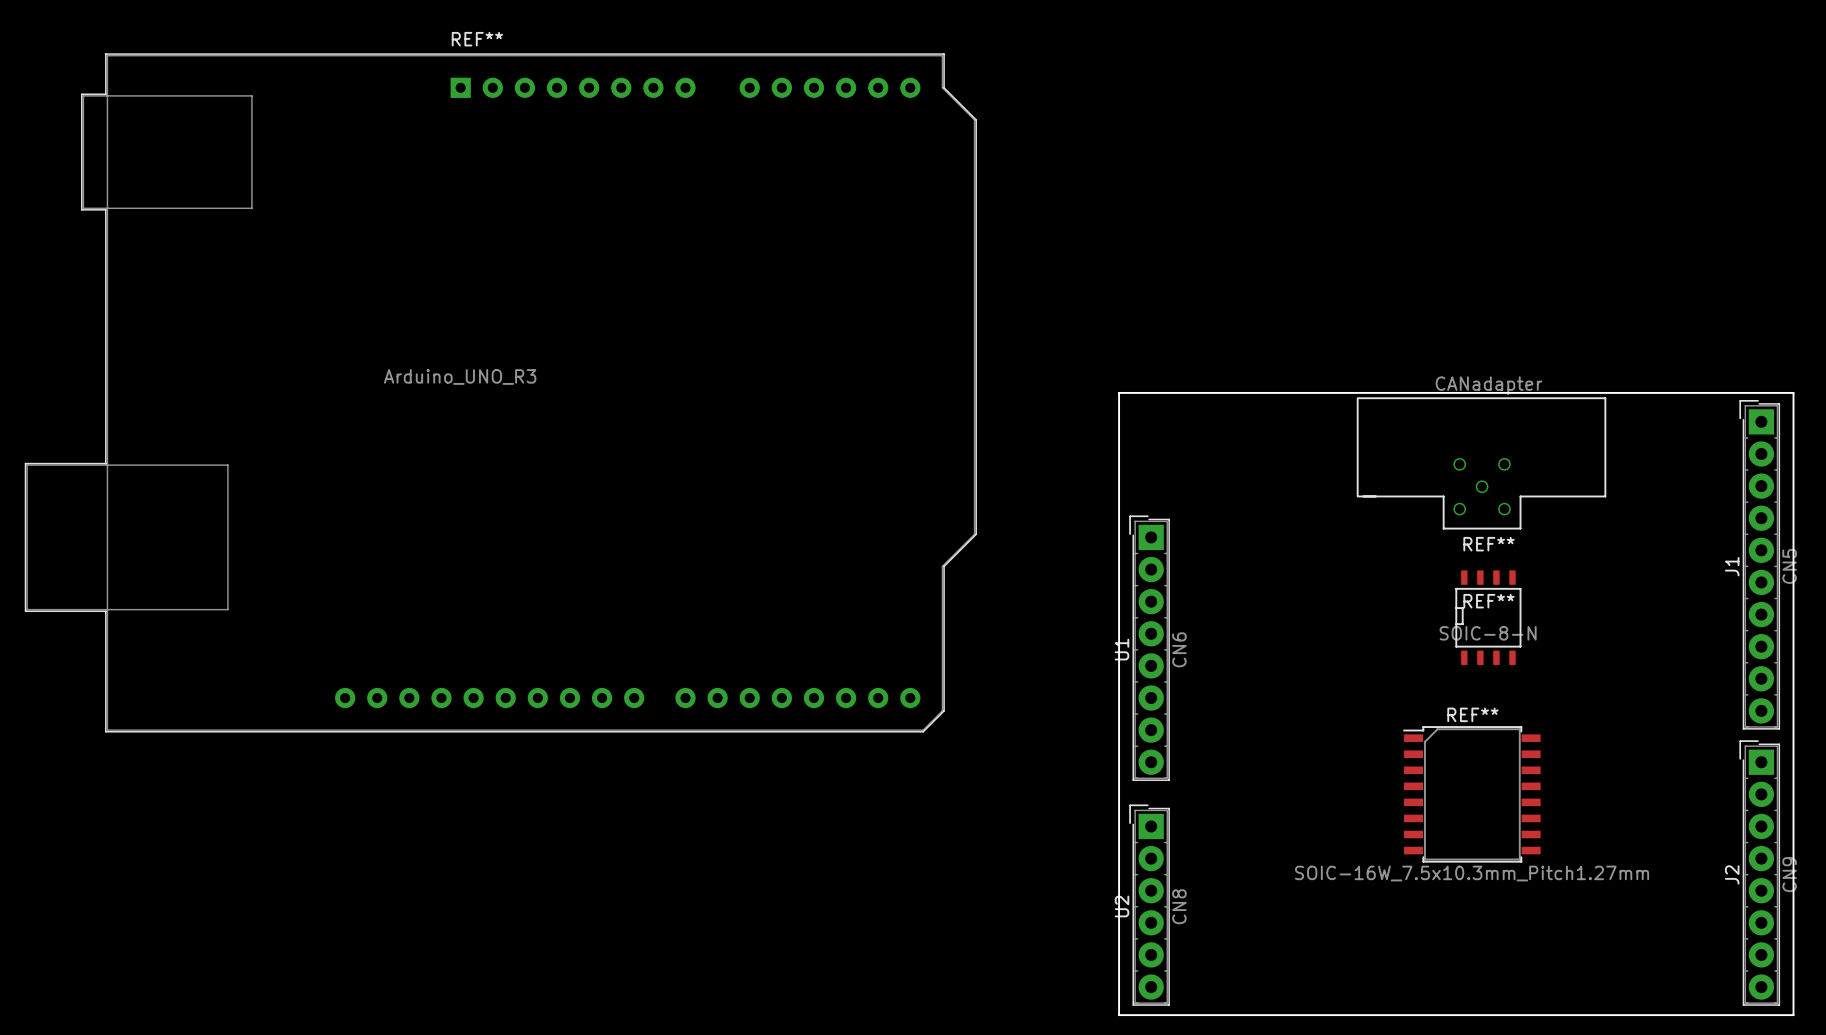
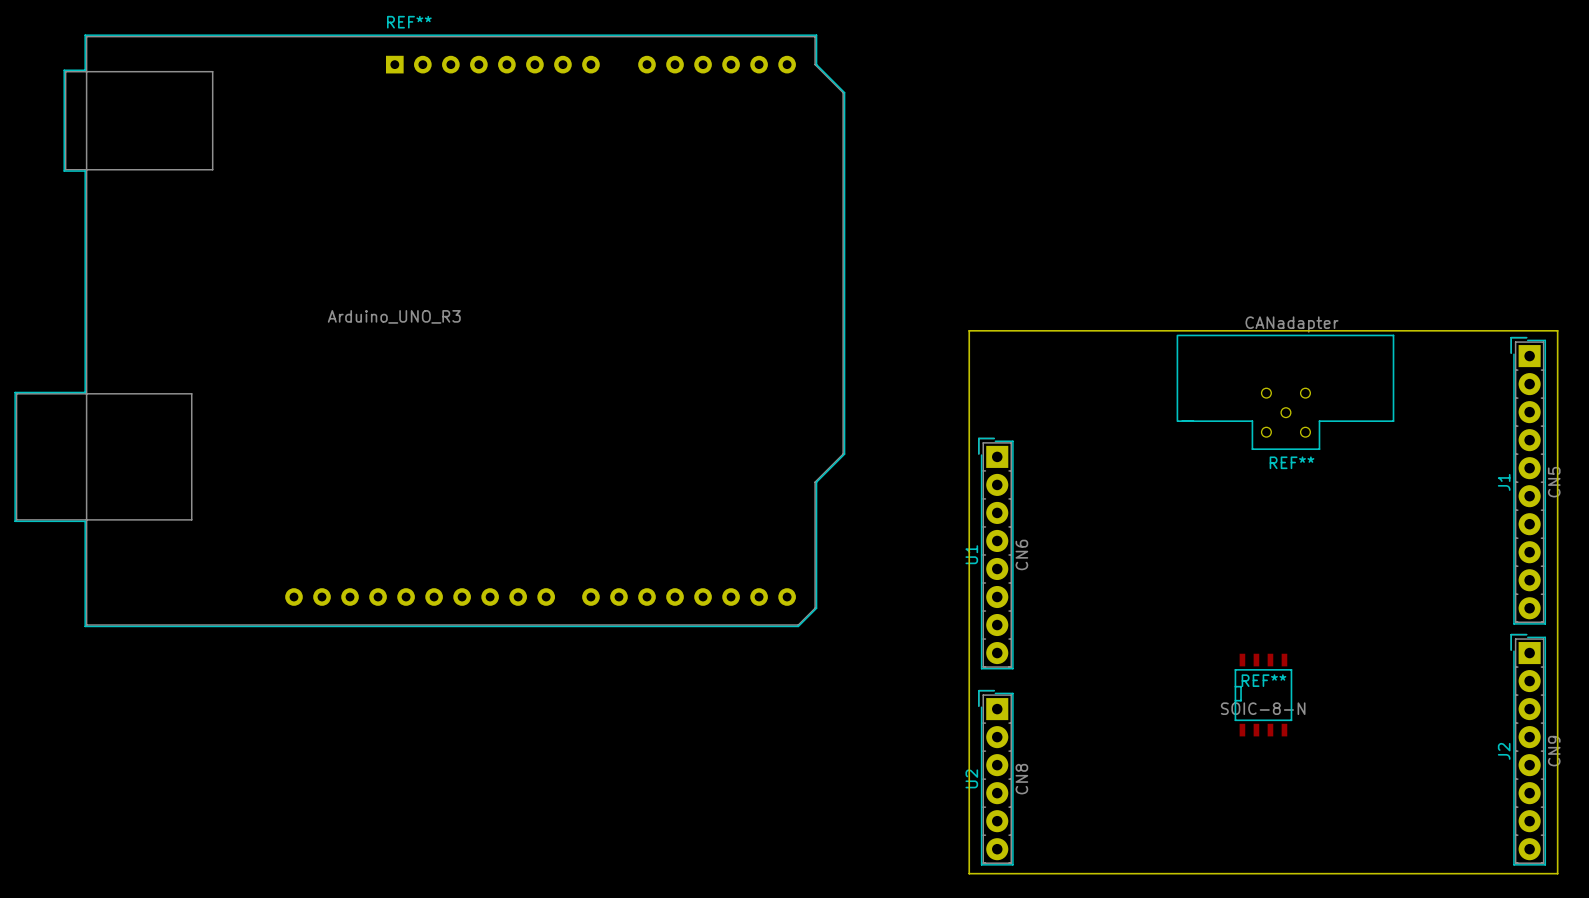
REF** position: (1488, 617) -> (1263, 695)
REF**: SOIC-16W_7.5x10.3mm_Pitch1.27mm (1471, 794) -> none

